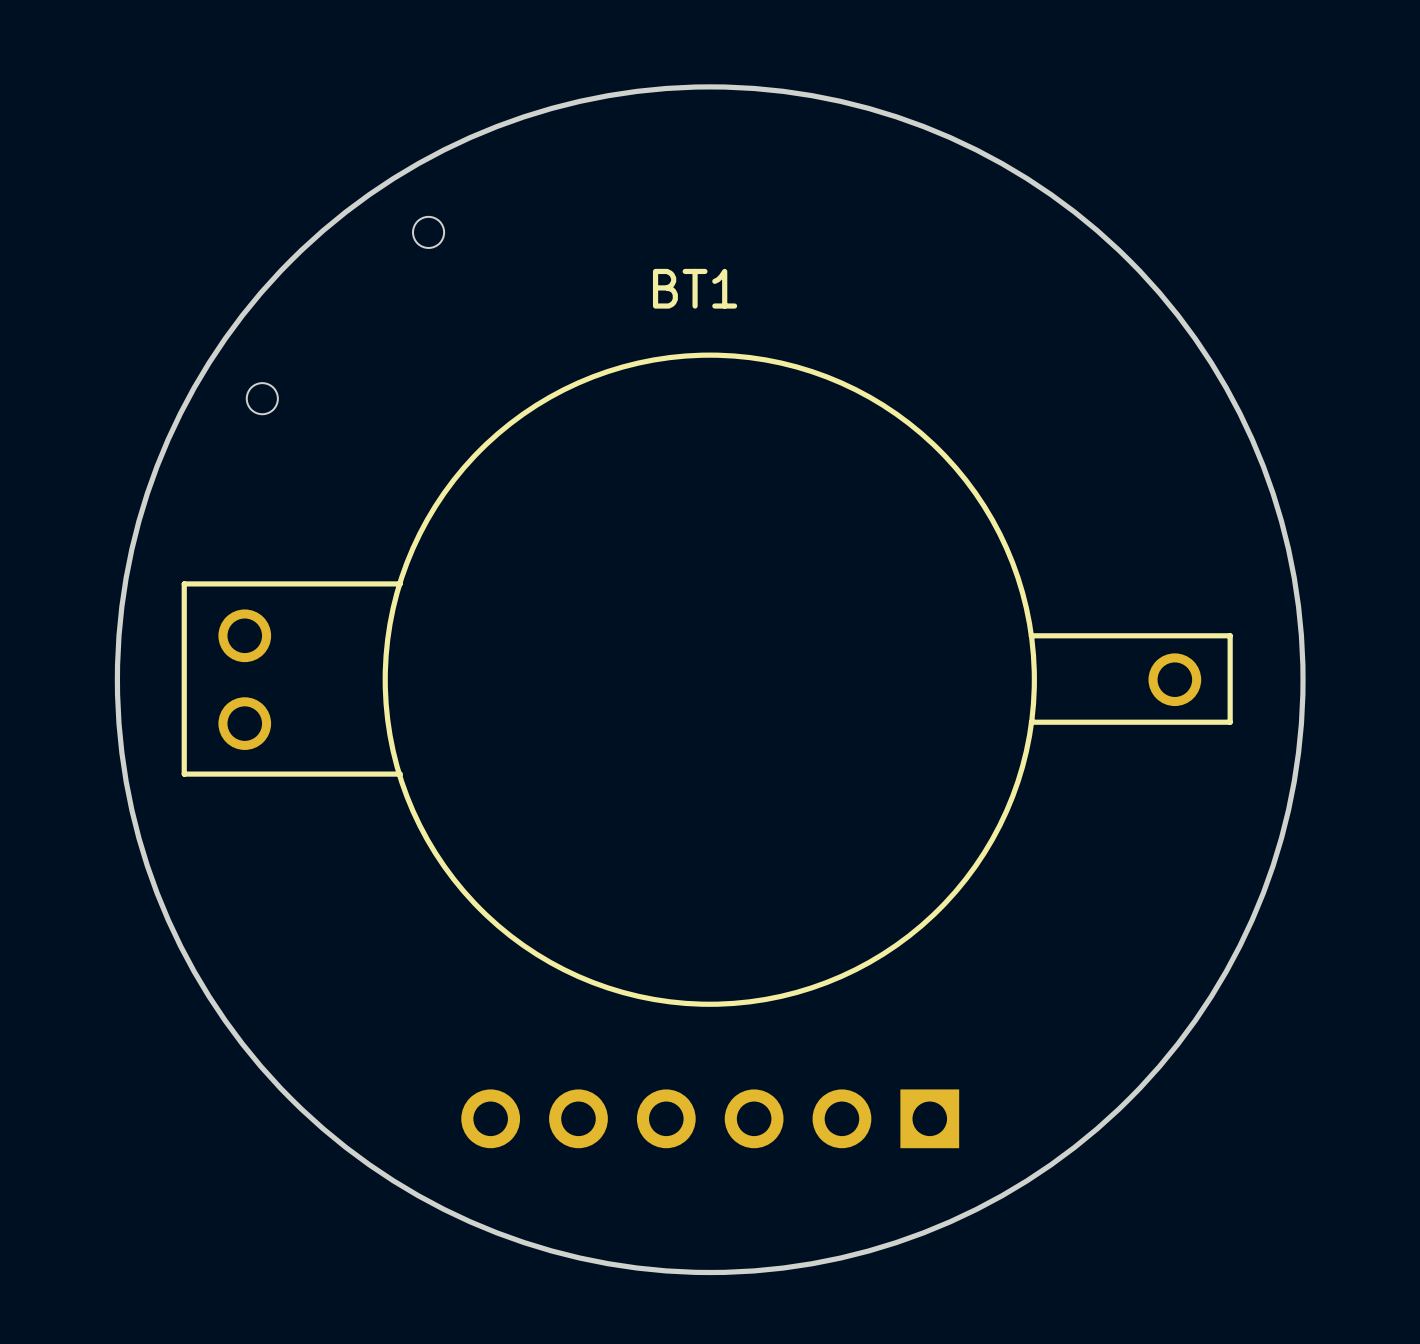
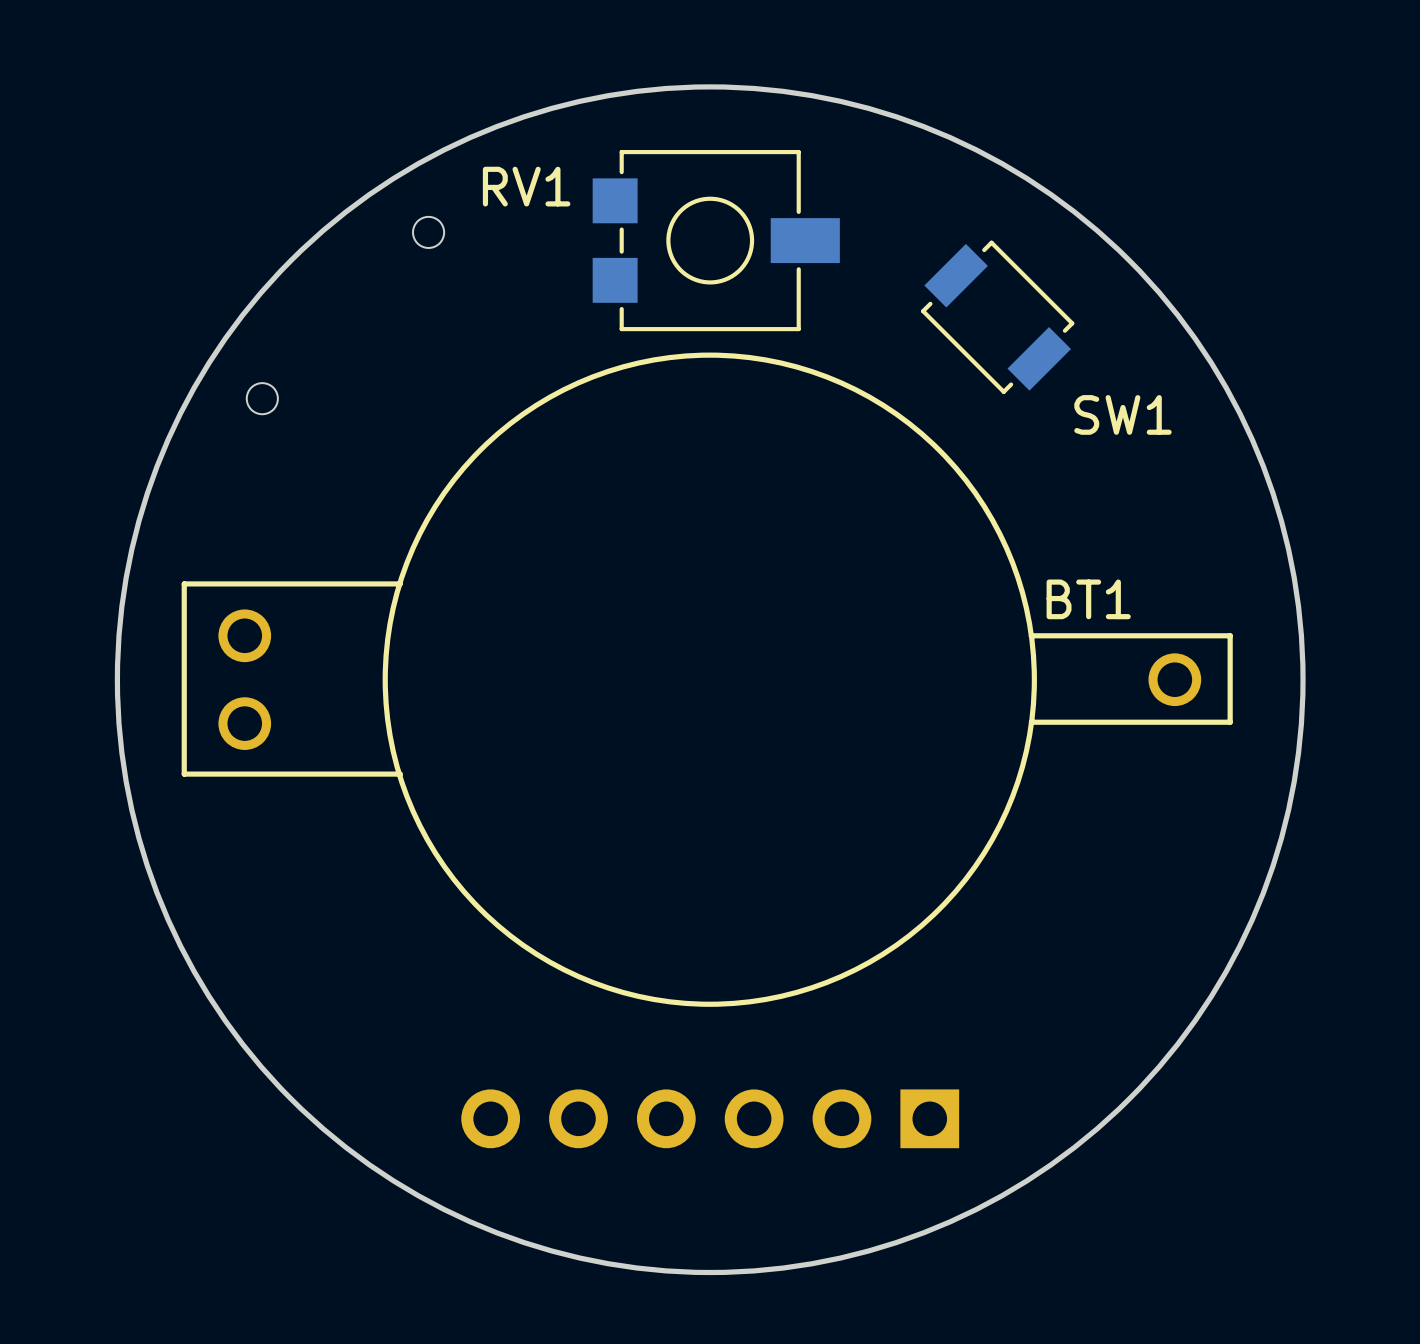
RV1: none -> (716, 240)
BT1 name position: BT1 (695, 288) -> BT1 (1088, 599)
SW1: none -> (997, 317)

